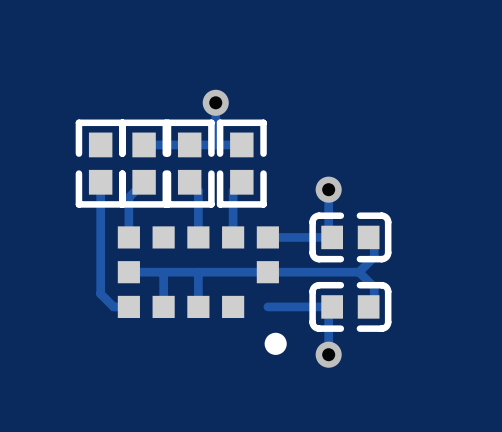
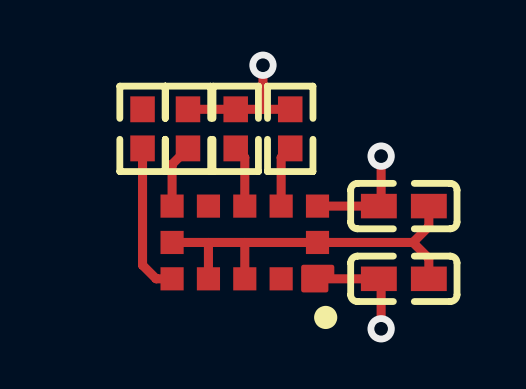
part footprint: [309, 212, 392, 263] -> [347, 179, 461, 233]
part footprint: [117, 226, 287, 355] -> [160, 194, 338, 330]
part footprint: [309, 281, 392, 332] -> [347, 252, 461, 305]

